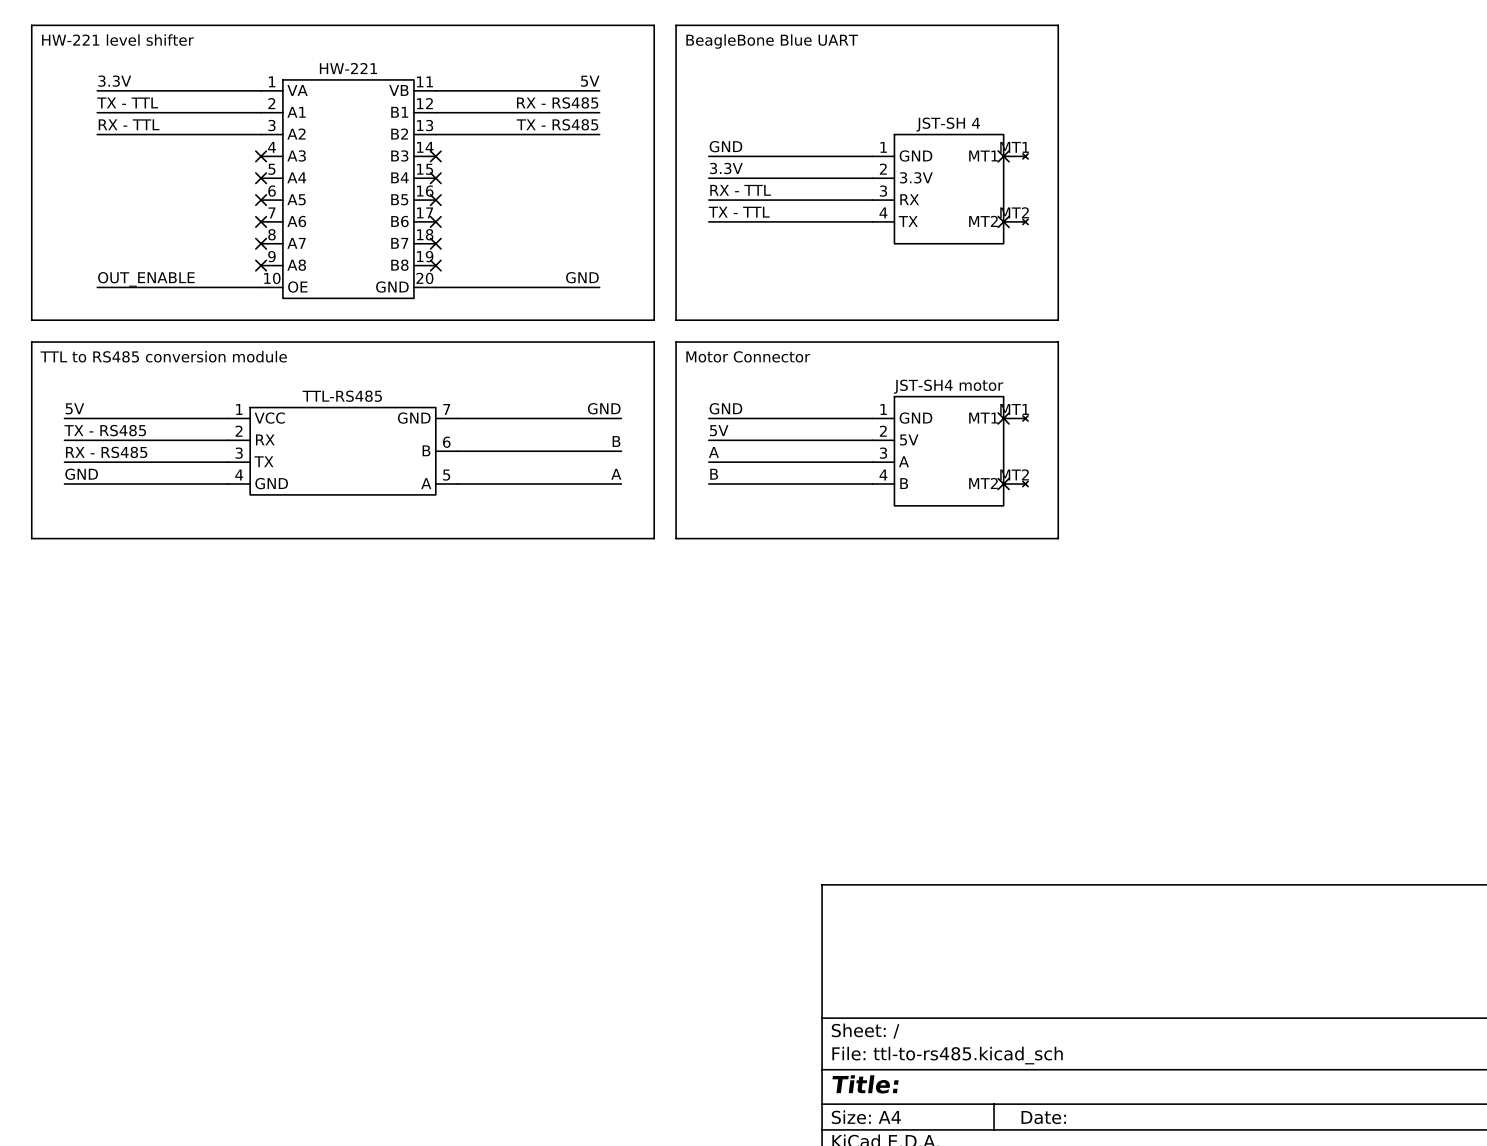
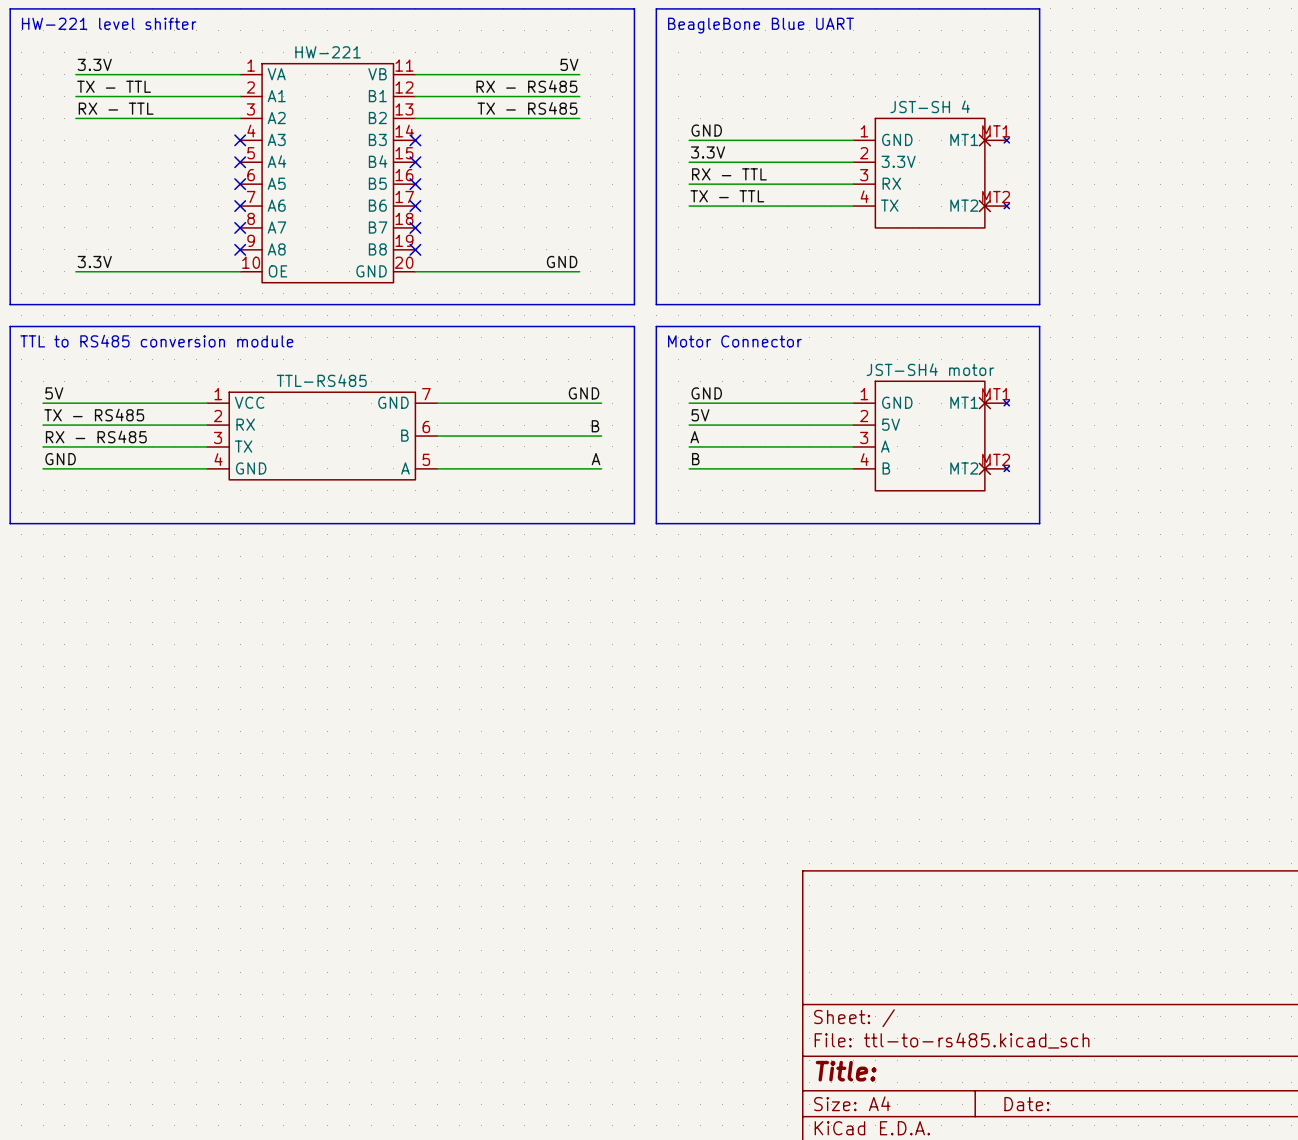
label: OUT_ENABLE (146, 279) -> 3.3V (94, 261)

